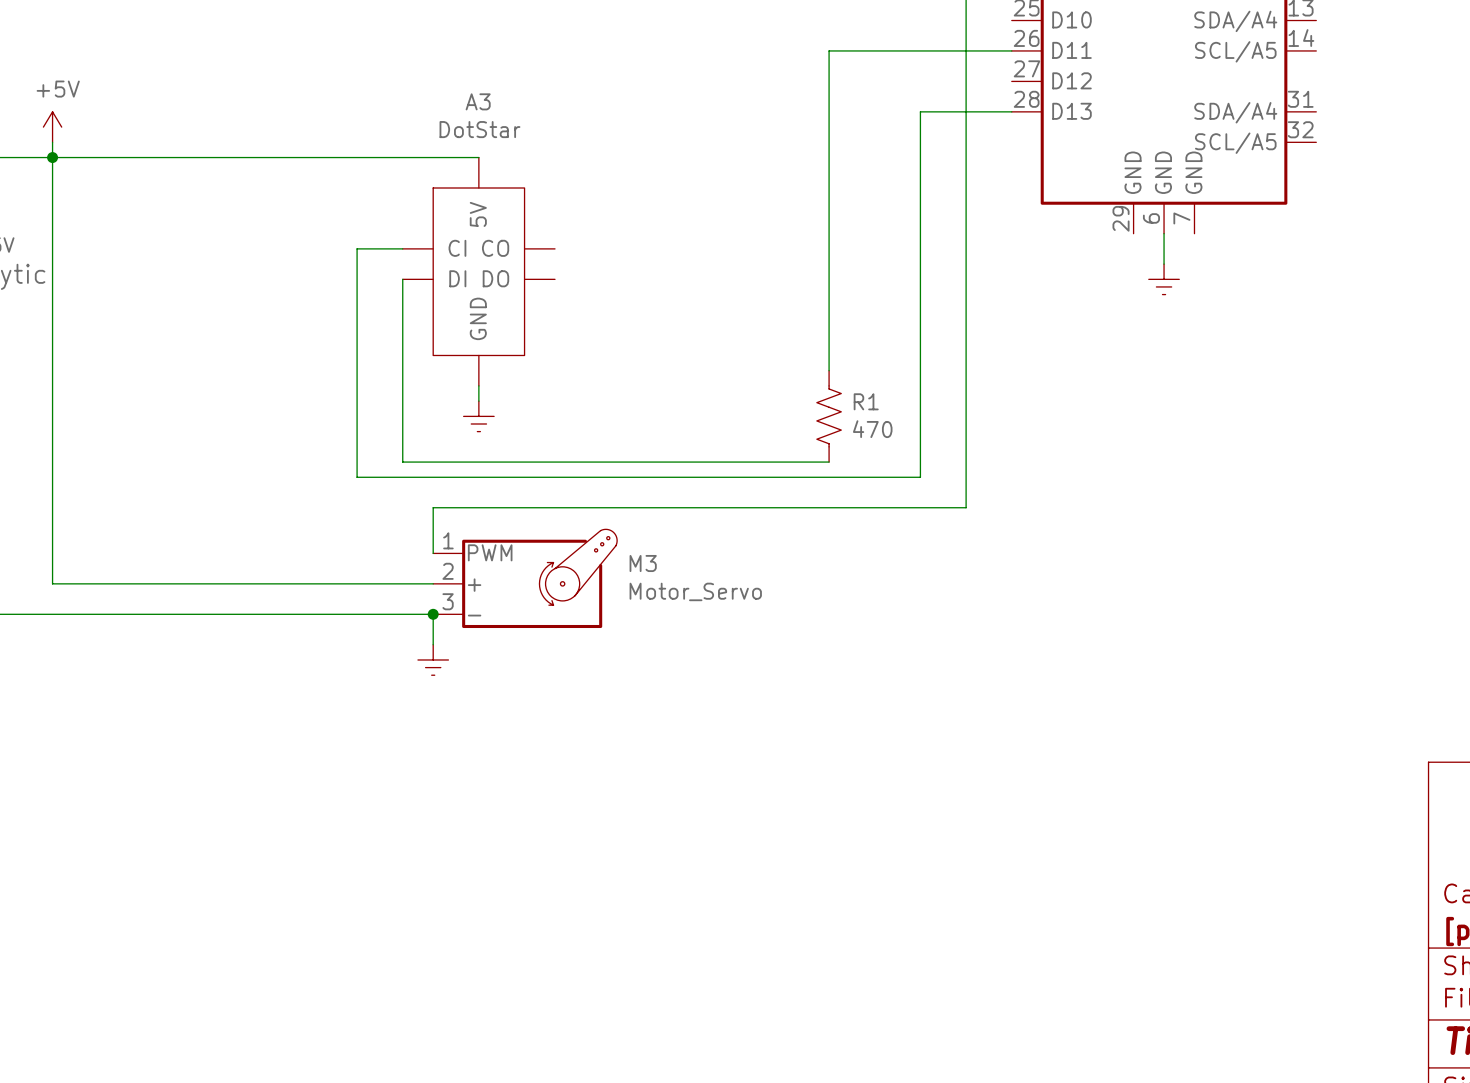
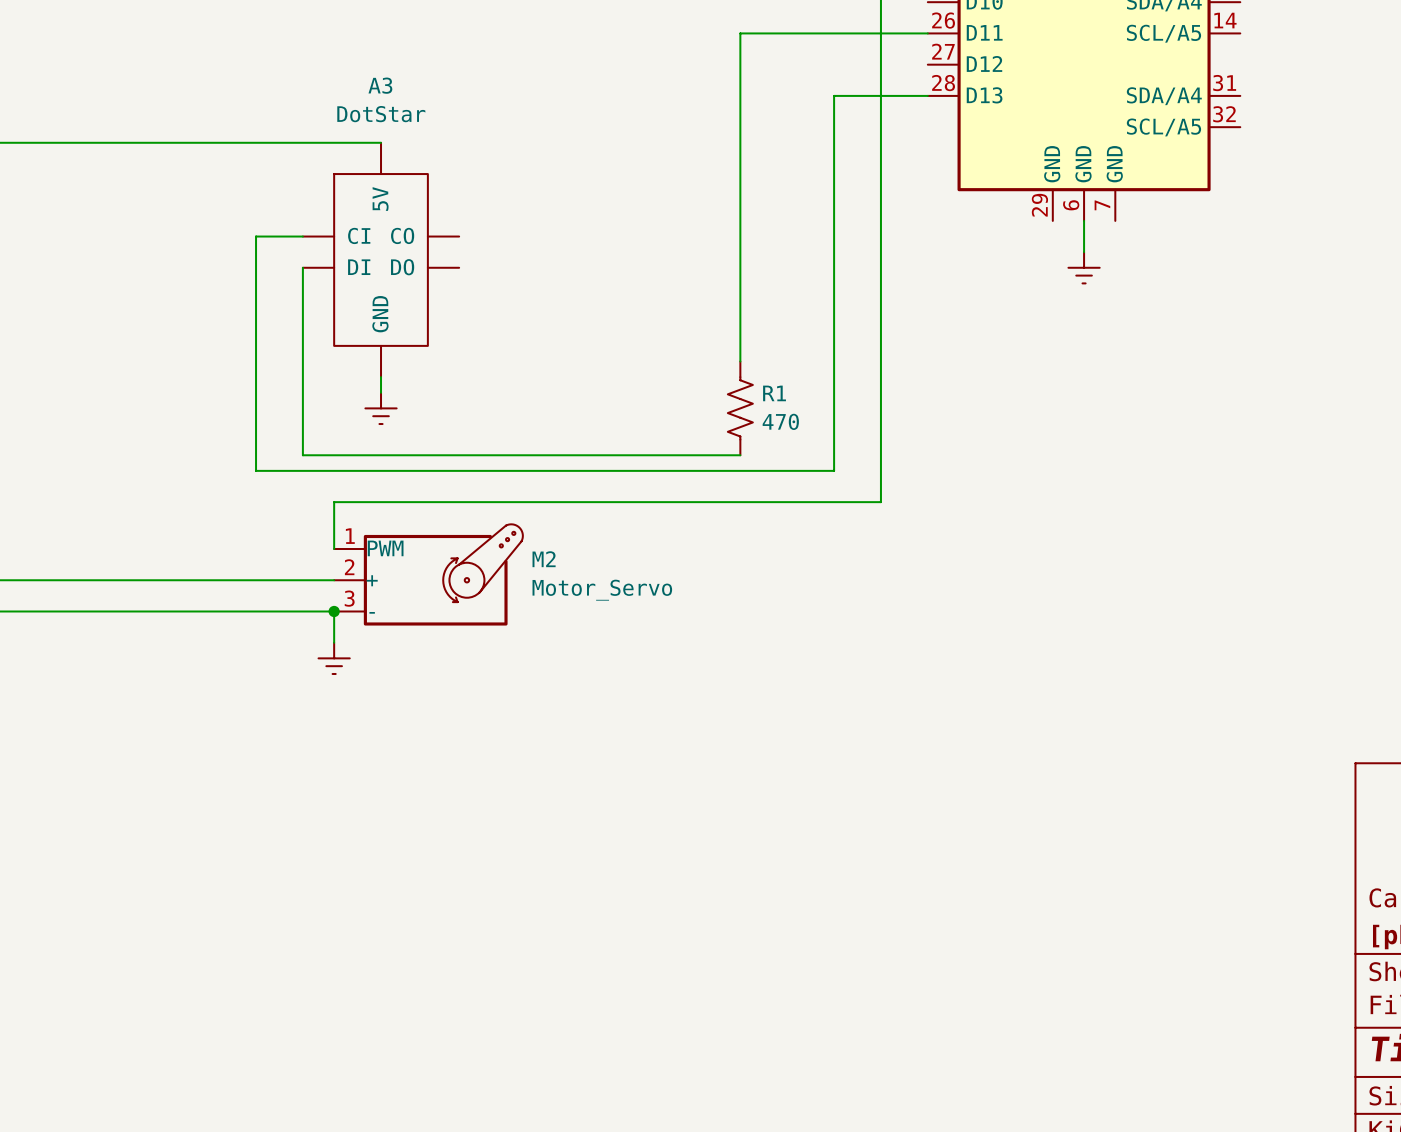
M3 name: M3 (643, 563) -> M2 (544, 559)

